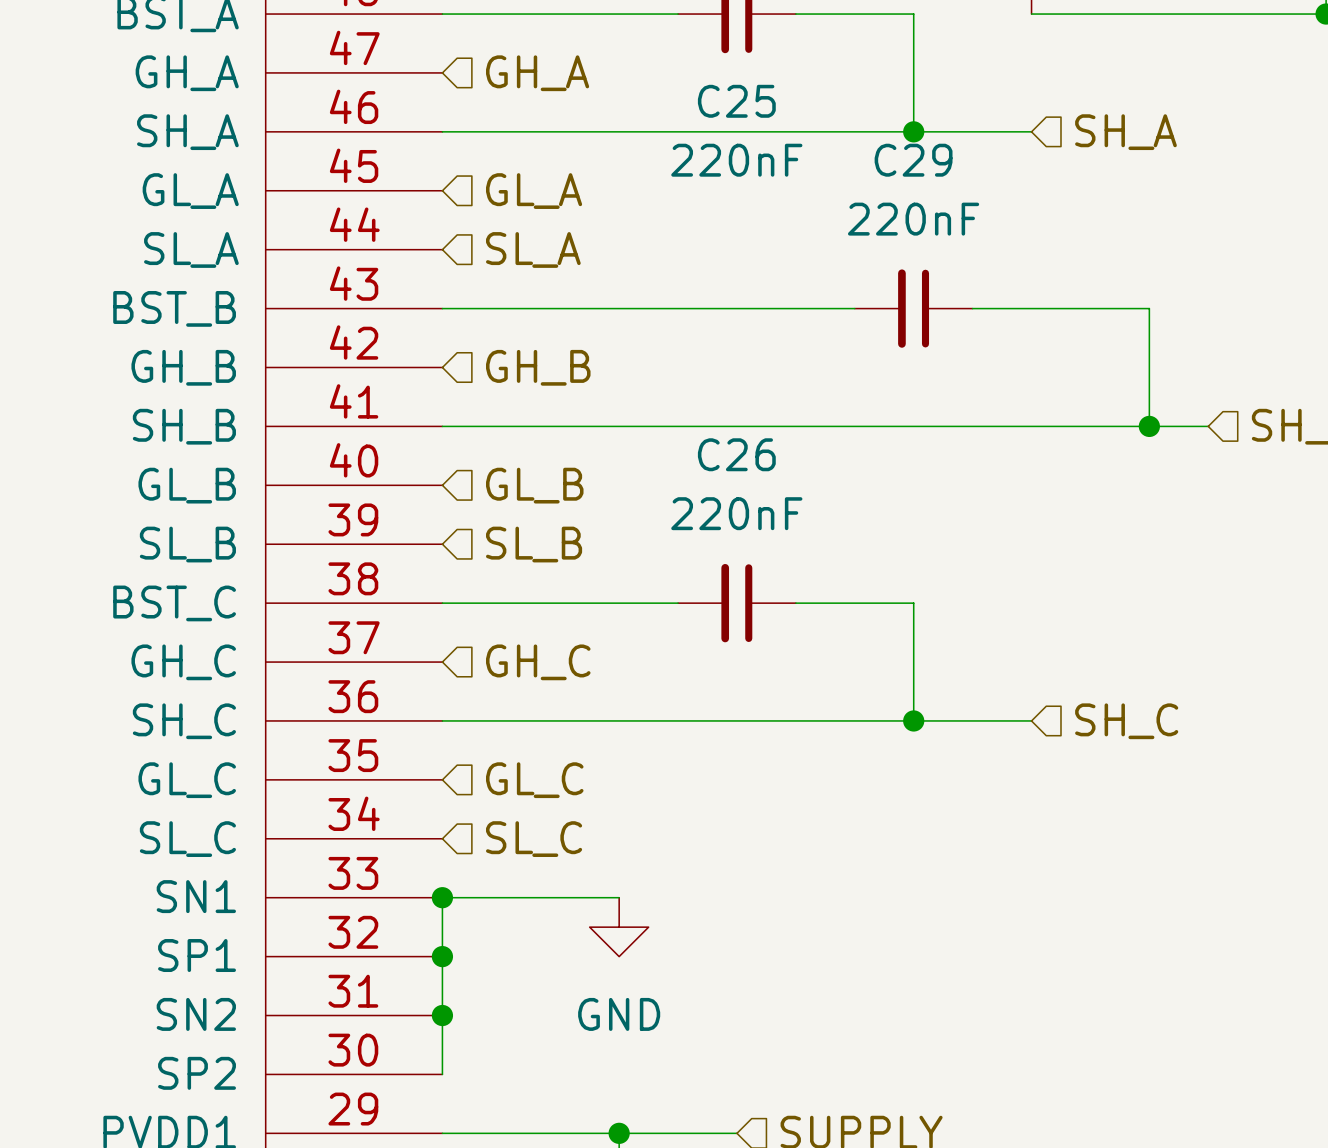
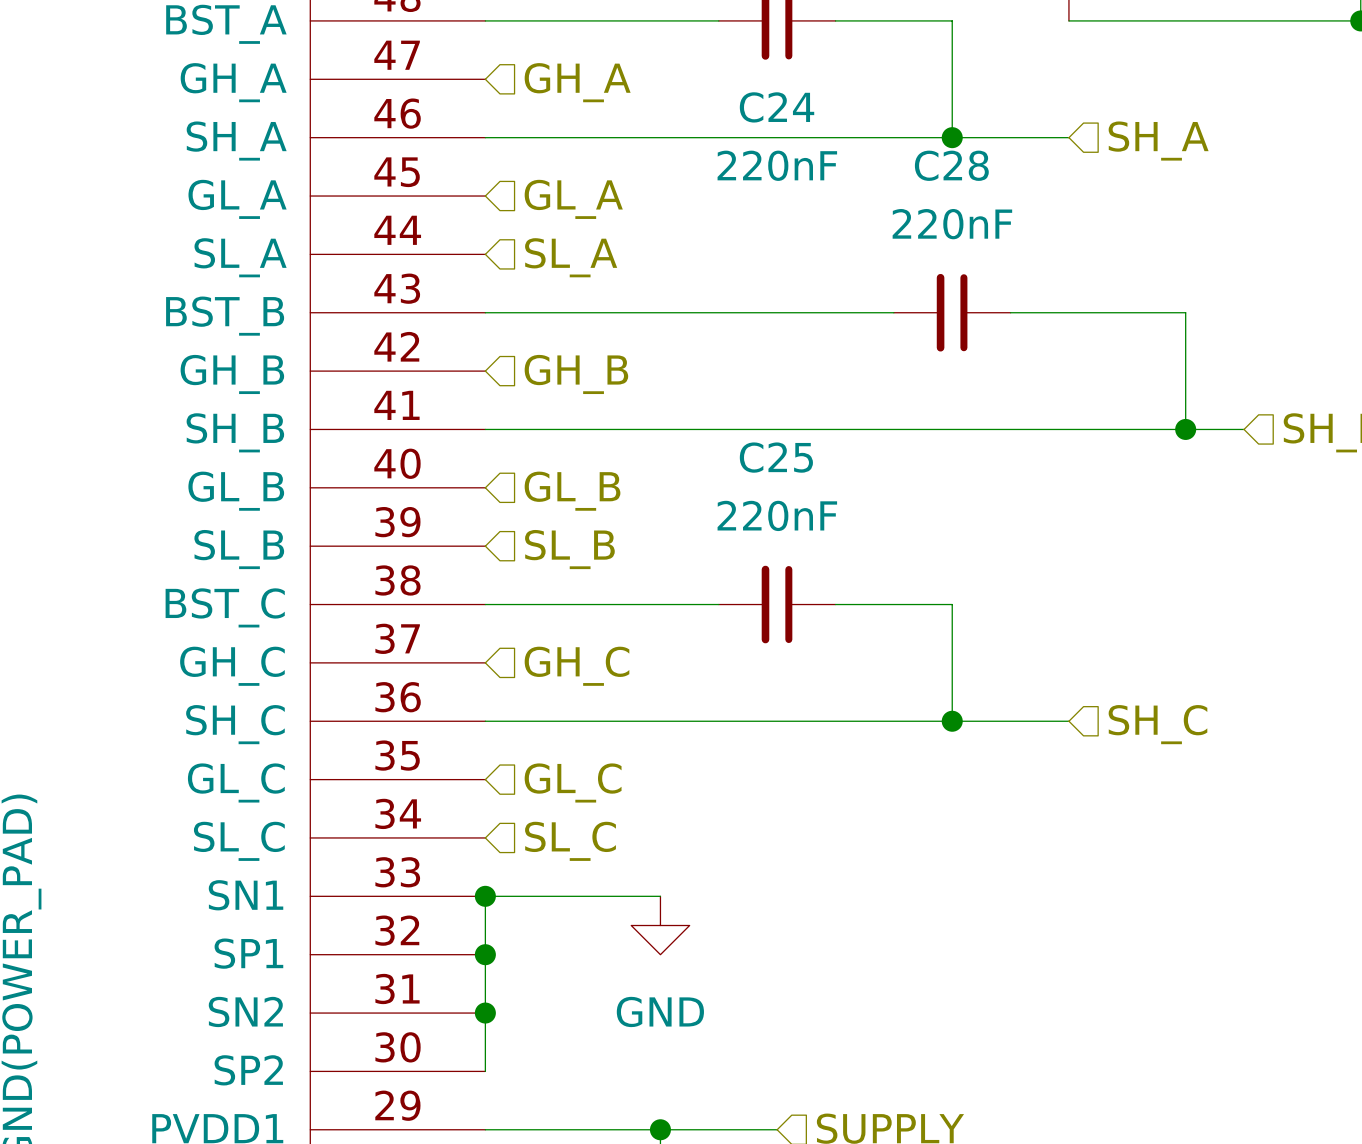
C25 name: C25 (736, 101) -> C24 (777, 107)
C29 name: C29 (913, 160) -> C28 (951, 165)
C26 name: C26 (736, 454) -> C25 (776, 457)

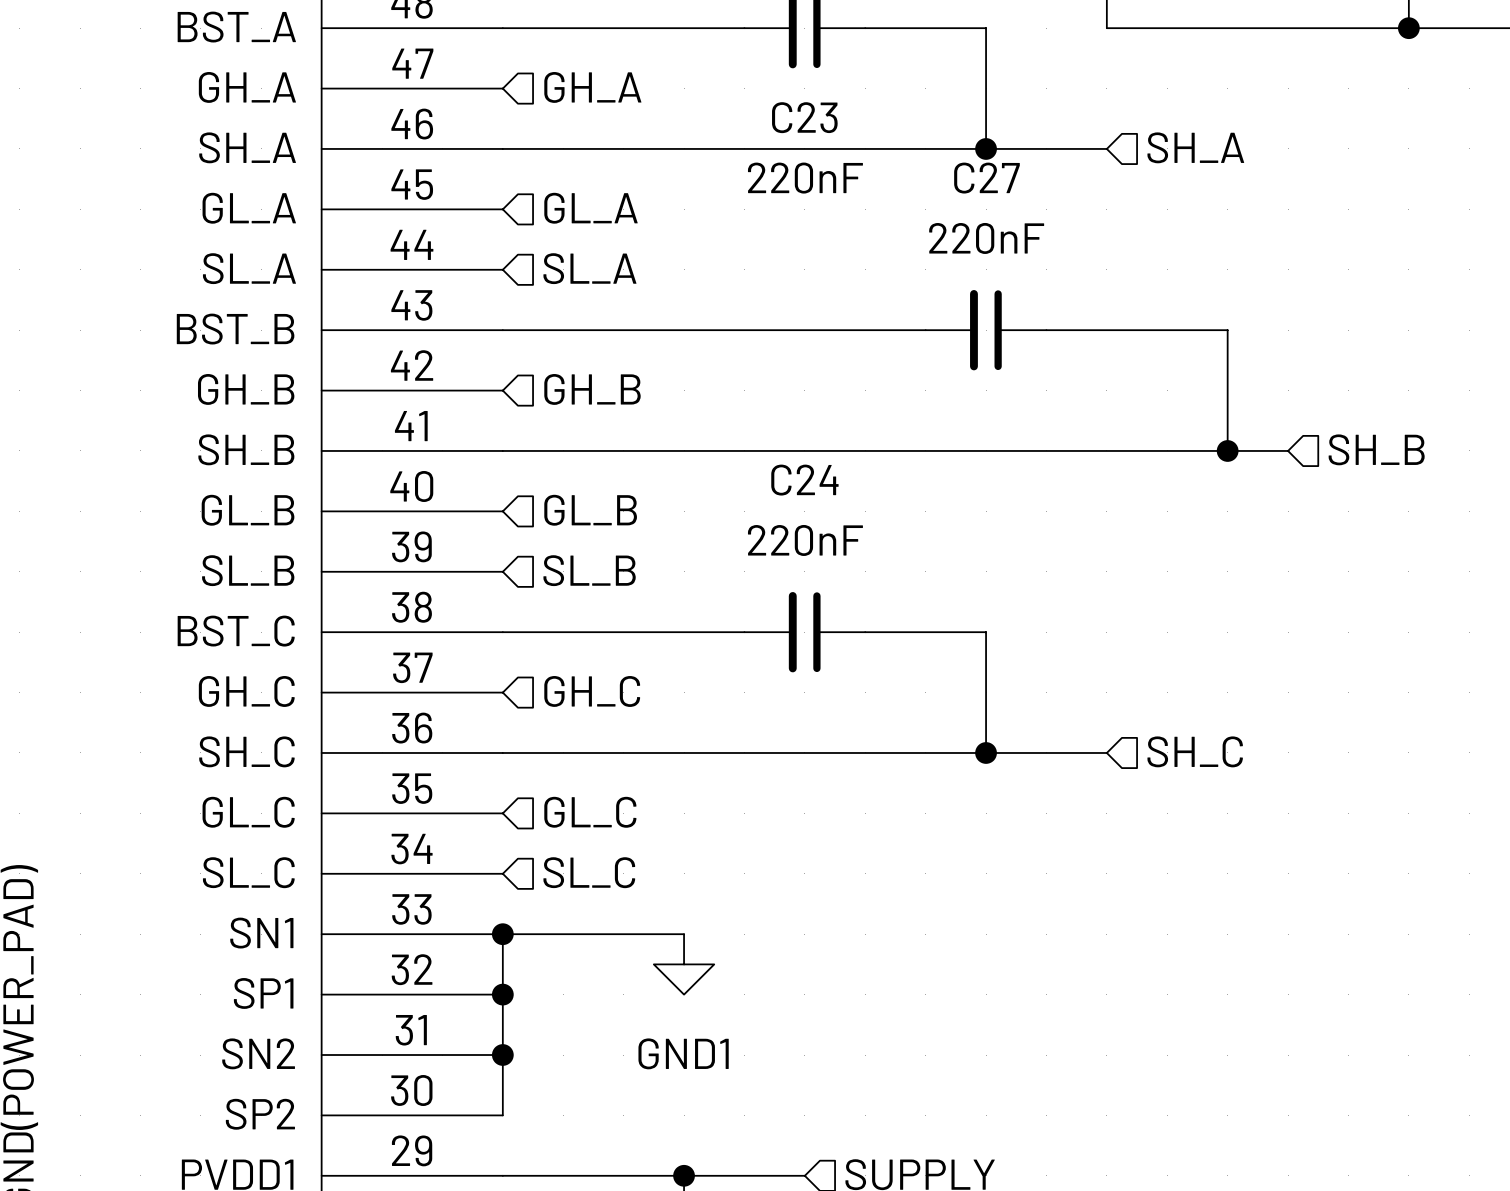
C24 name: C24 (777, 107) -> C23 (804, 117)
C28 name: C28 (951, 165) -> C27 (986, 178)
C25 name: C25 (776, 457) -> C24 (804, 480)
power symbol: GND (660, 925) -> GND1 (684, 964)

